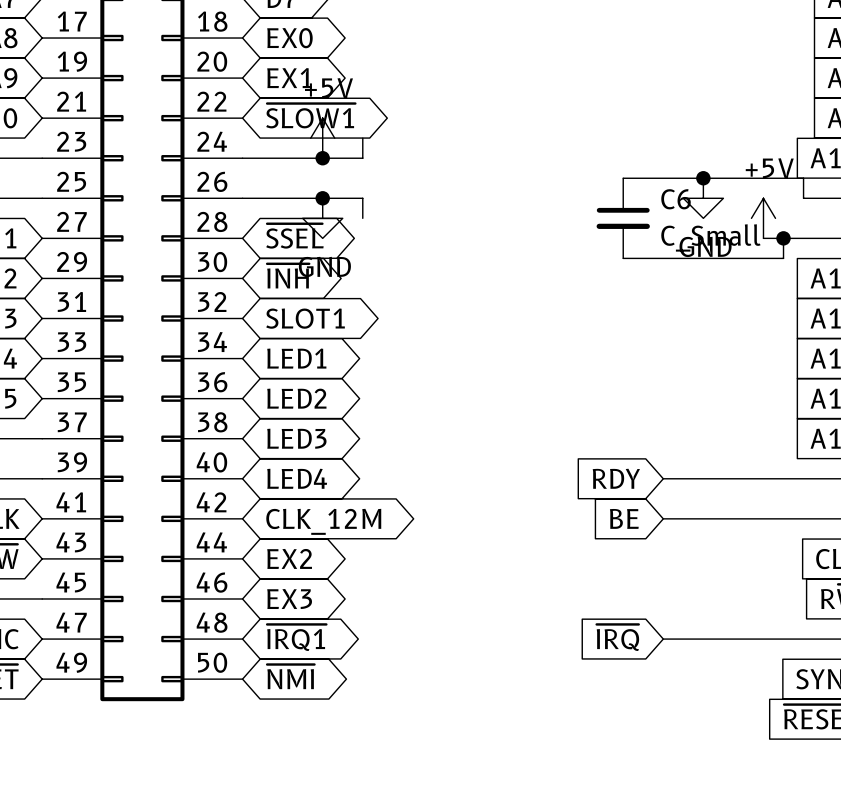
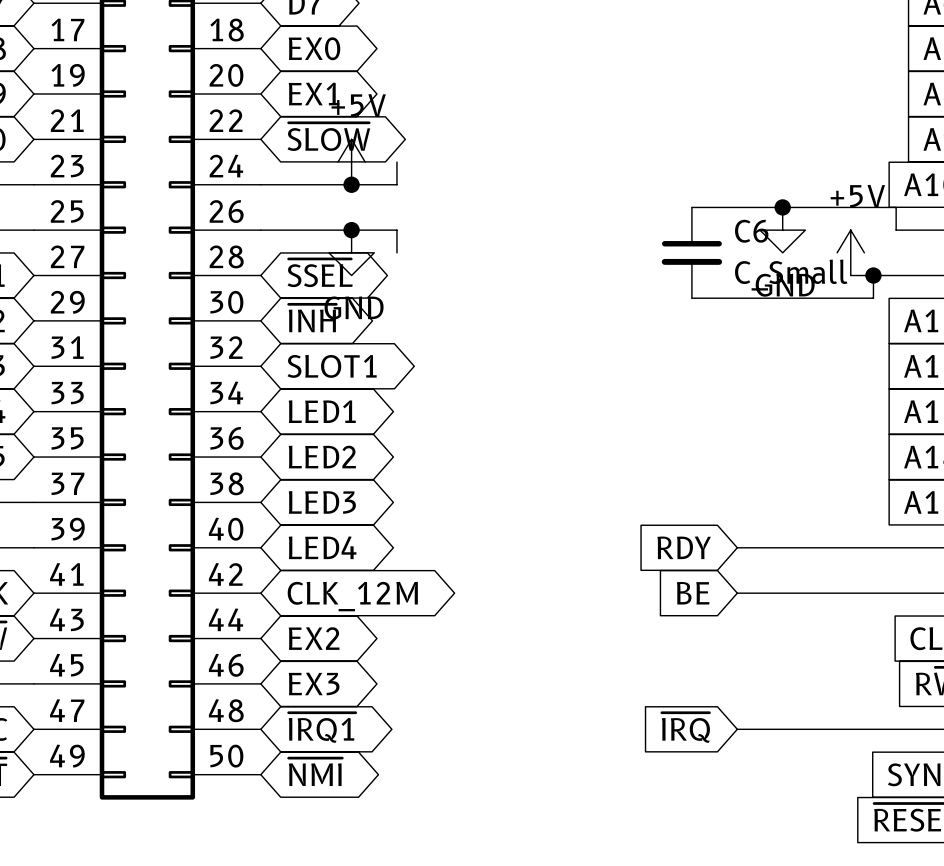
global label: ~{SLOW1} (310, 115) -> ~{SLOW} (328, 136)

